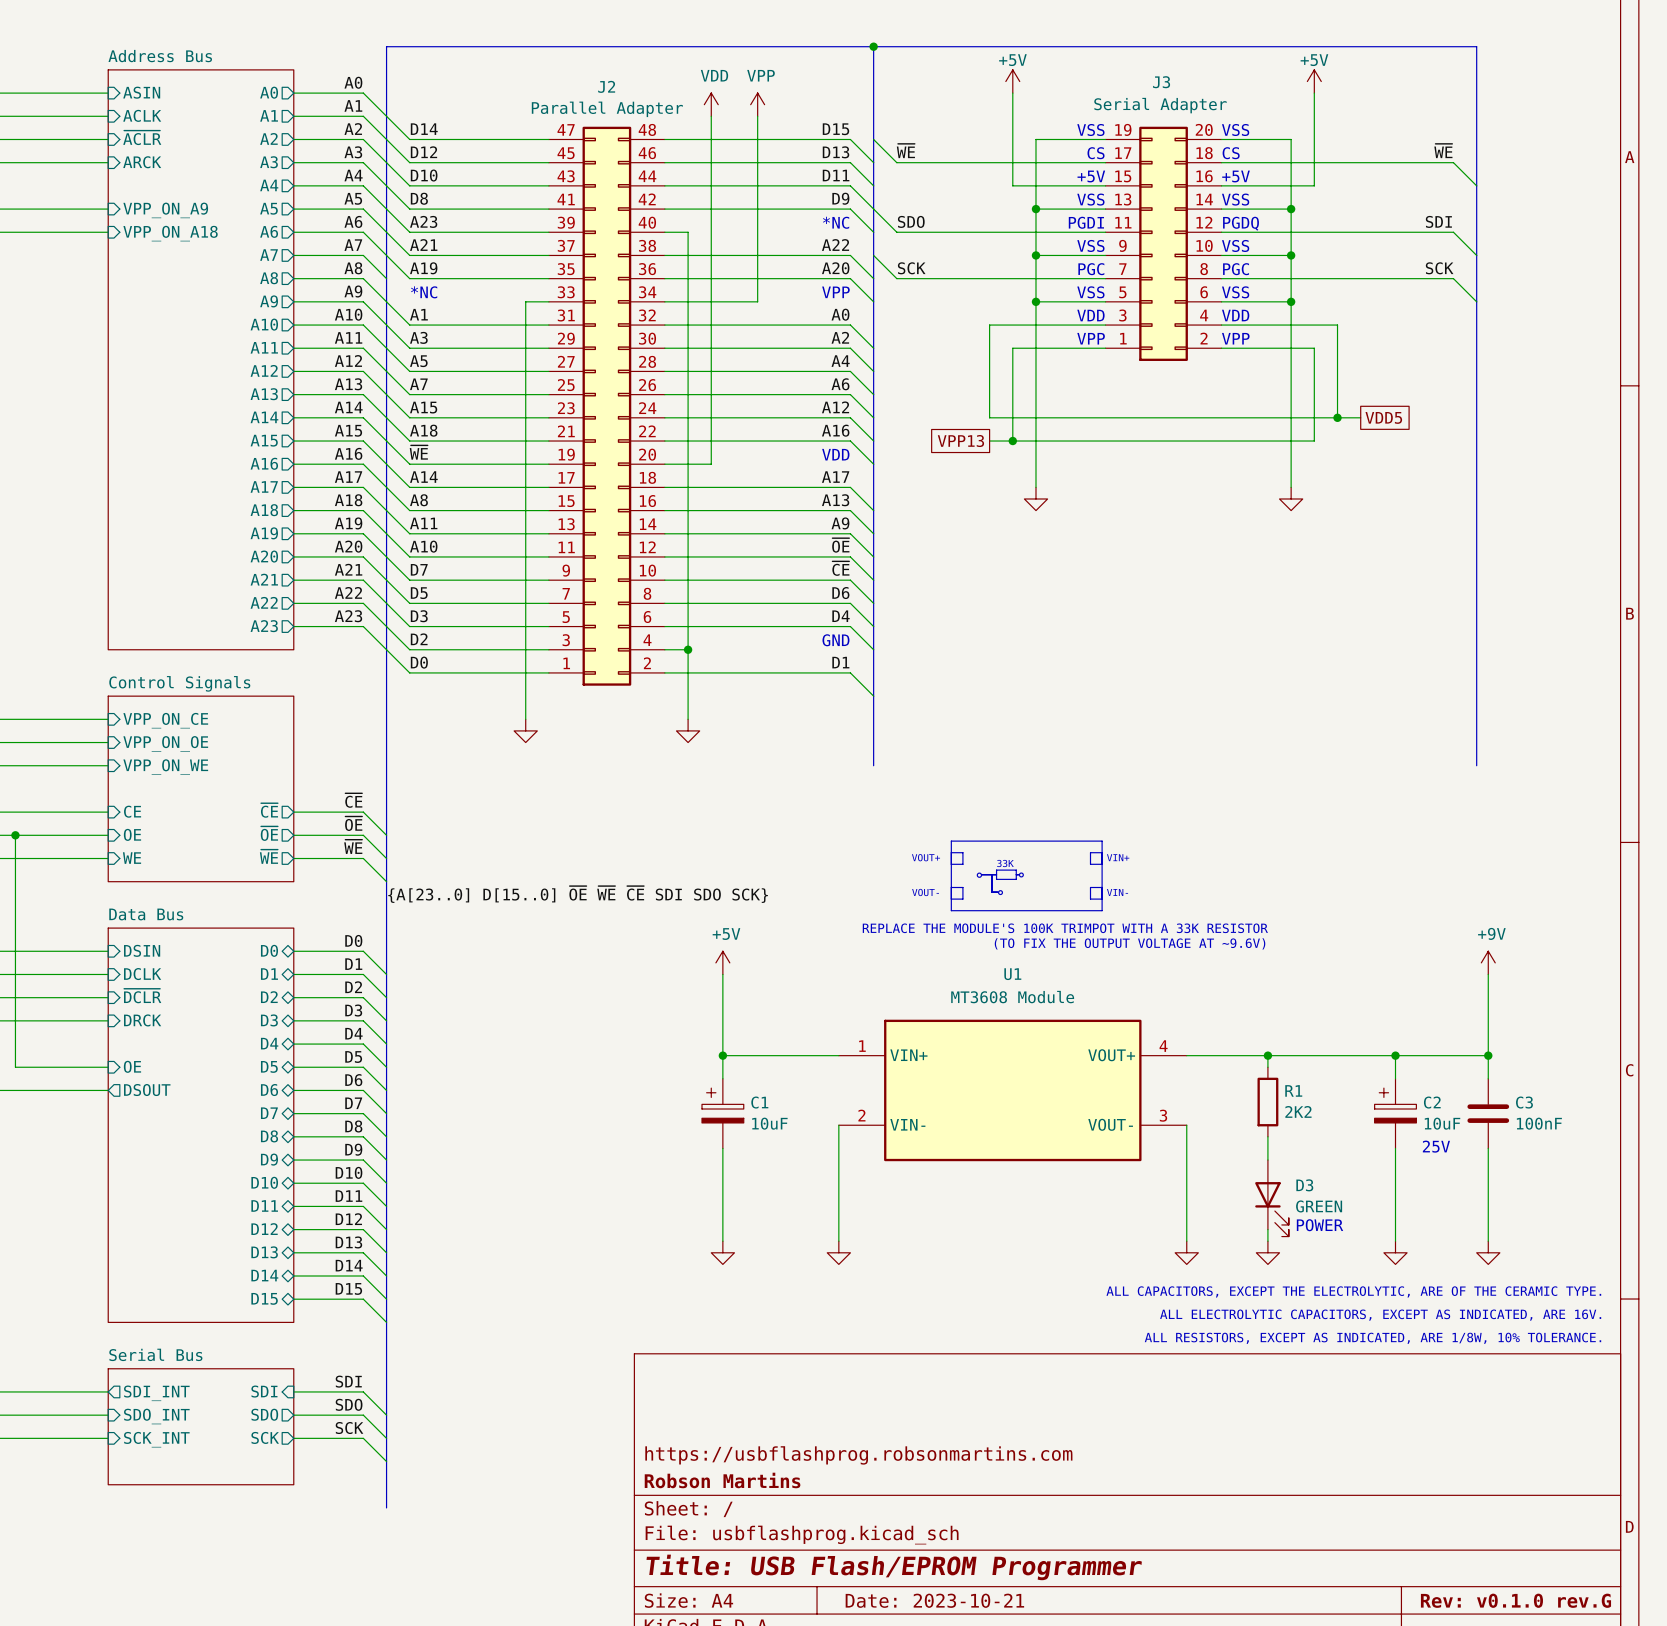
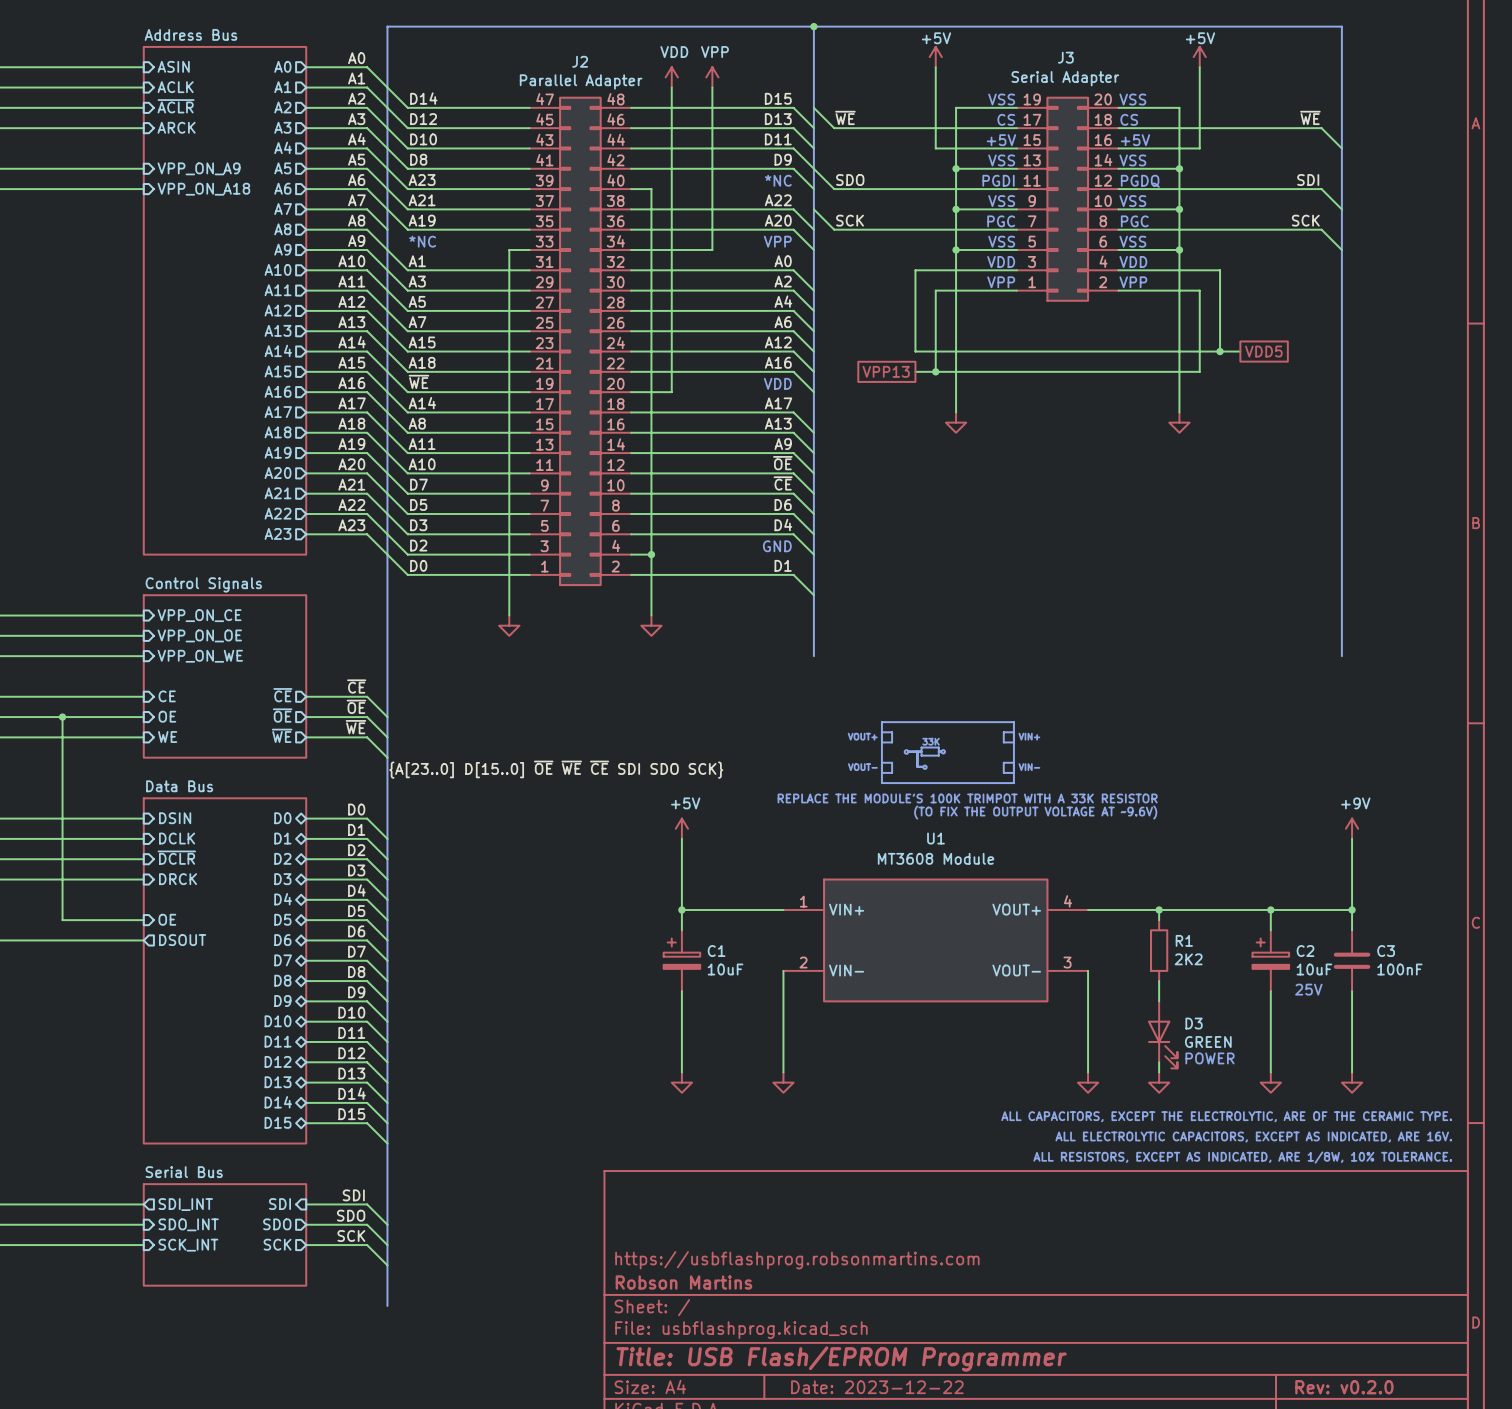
title block: Date: 2023-10-21 (934, 1600) -> Date: 2023-12-22 (877, 1387)
title block: Rev: v0.1.0 rev.G (1515, 1600) -> Rev: v0.2.0 (1344, 1387)

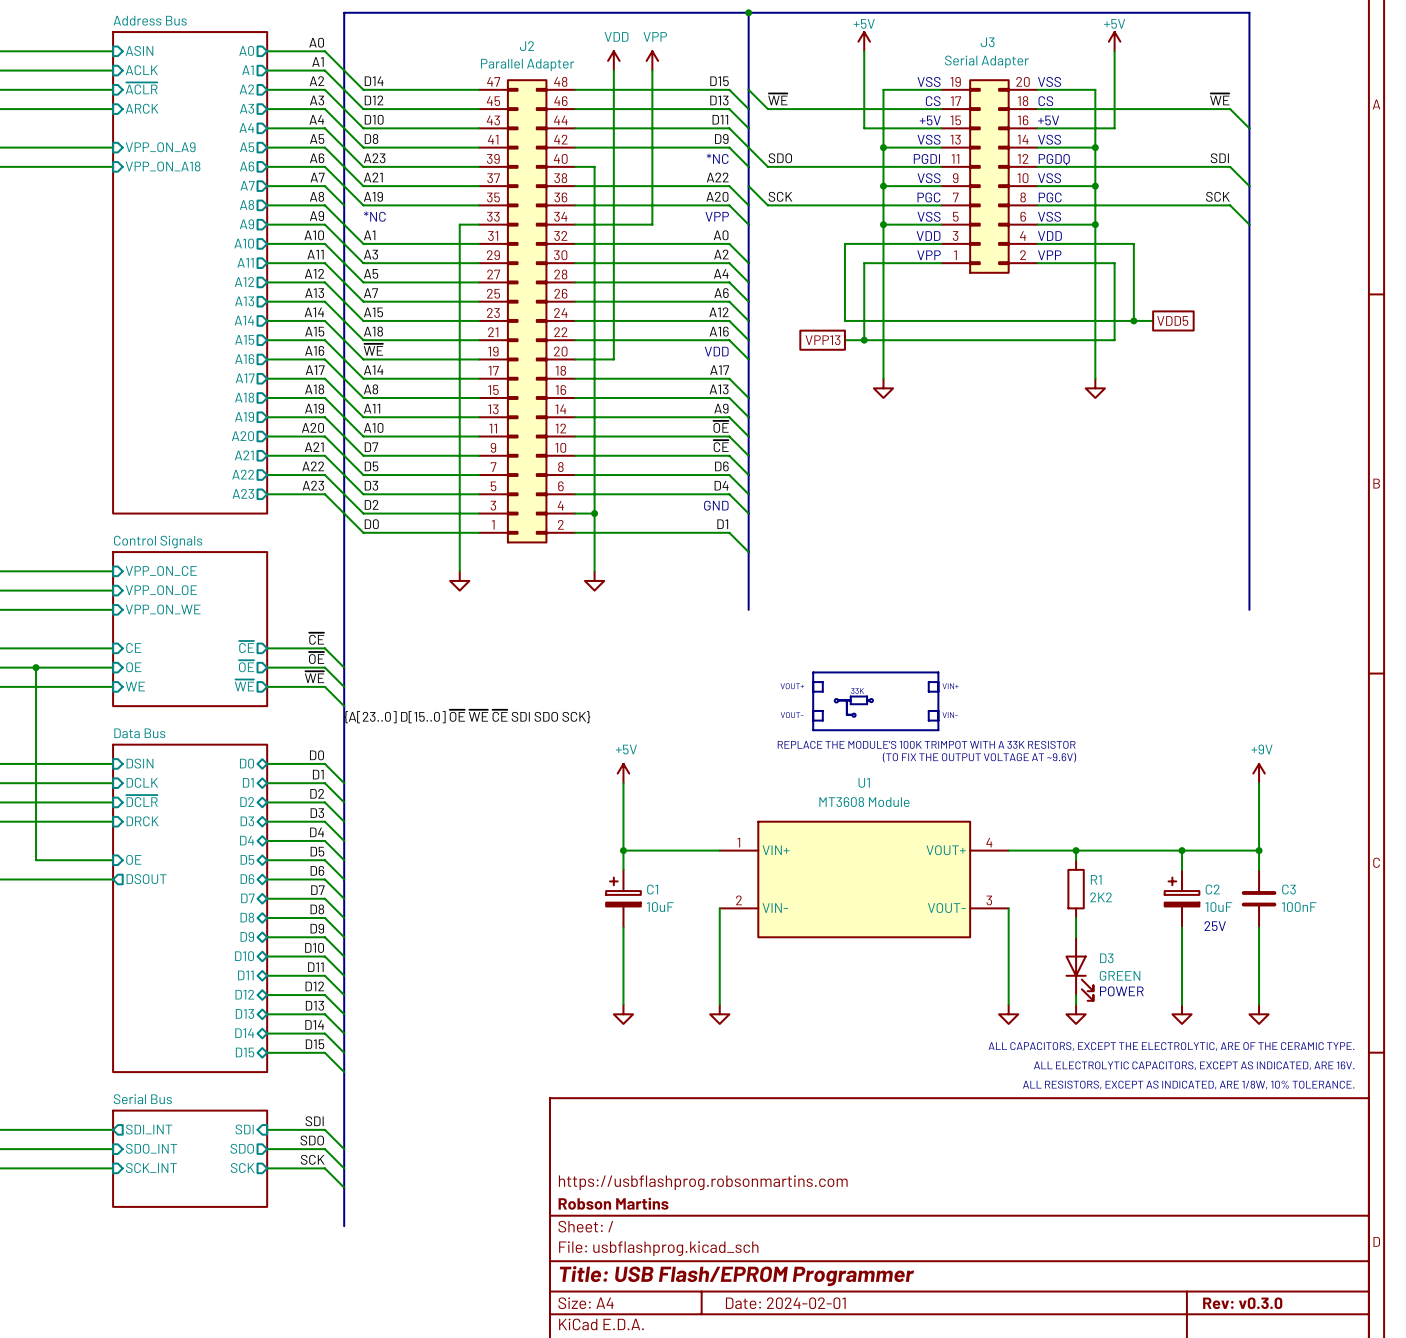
title block: Date: 2023-12-22 (877, 1387) -> Date: 2024-02-01 (785, 1303)
title block: Rev: v0.2.0 (1344, 1387) -> Rev: v0.3.0 (1242, 1303)

